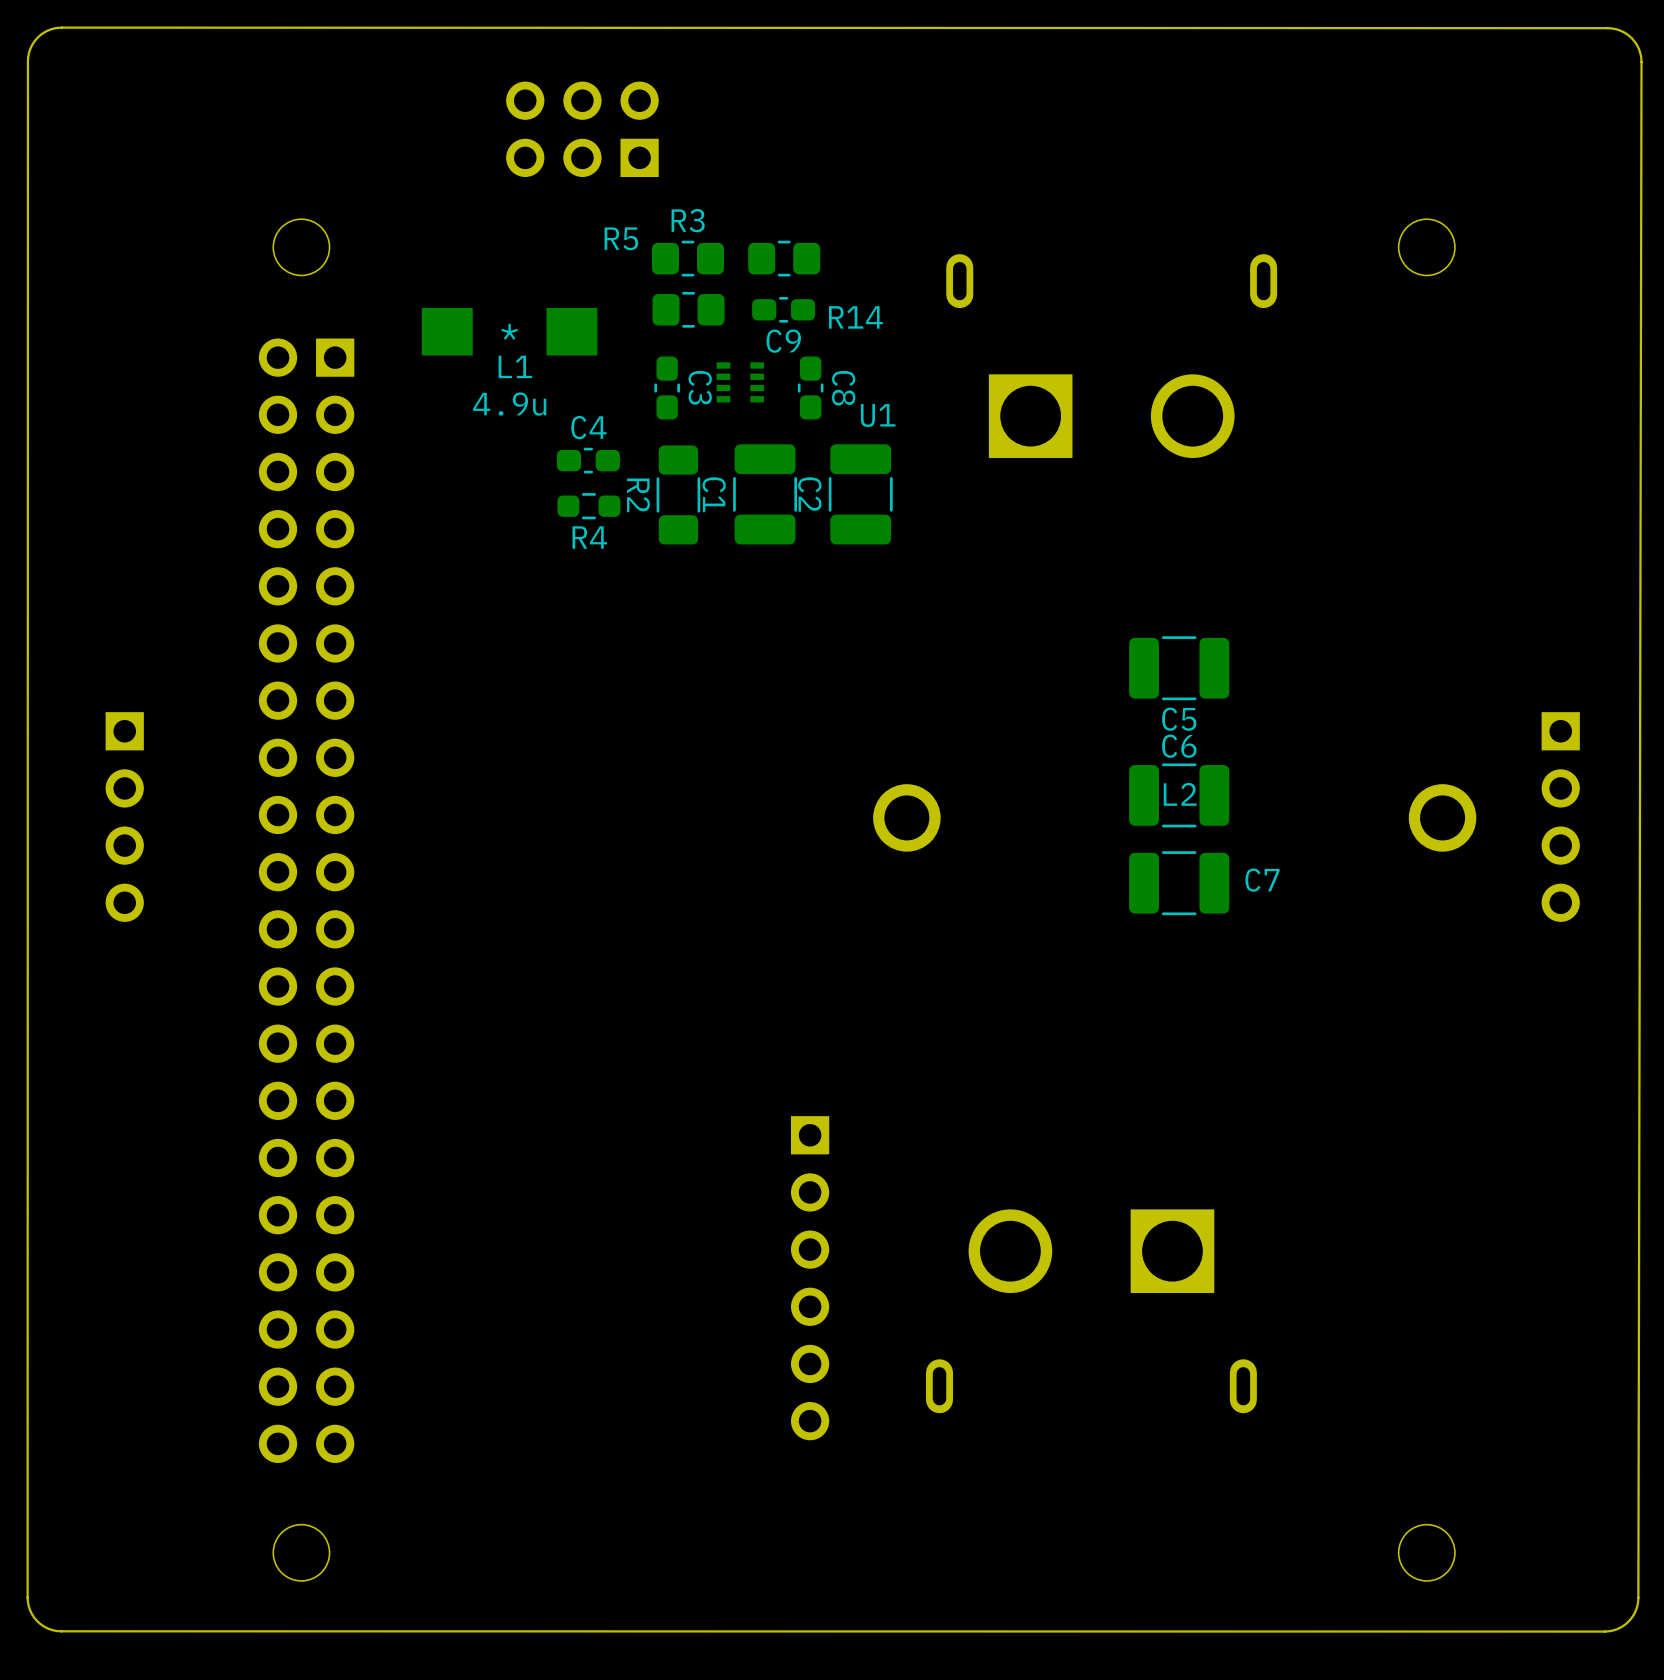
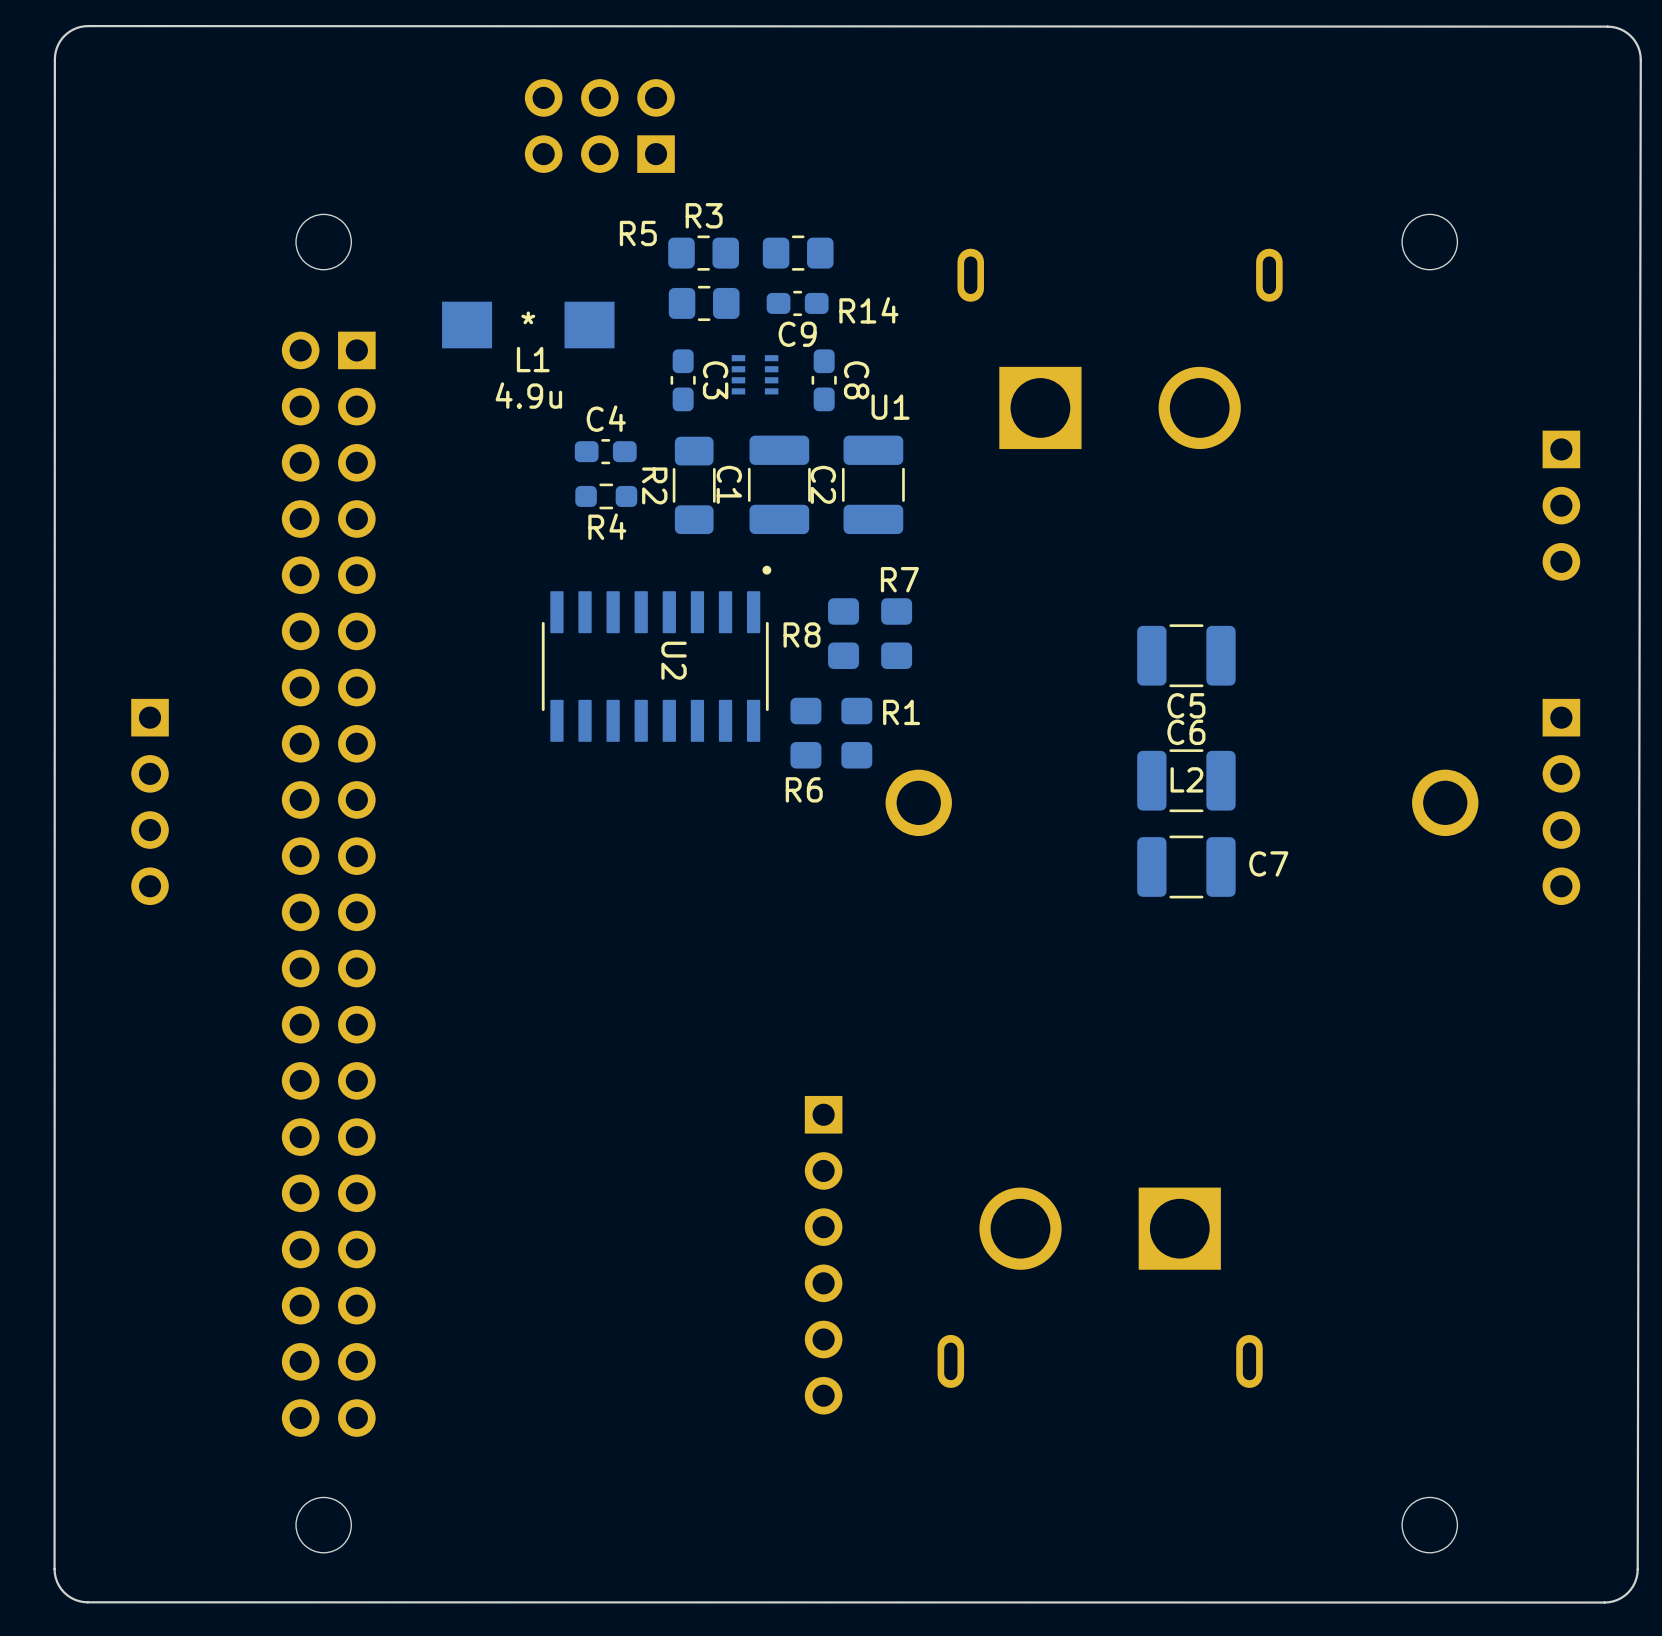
part: none -> (1561, 505)
R8: none -> (843, 633)
R7: none -> (896, 633)
U2: none -> (656, 653)
R6: none -> (805, 733)
R1: none -> (856, 733)

